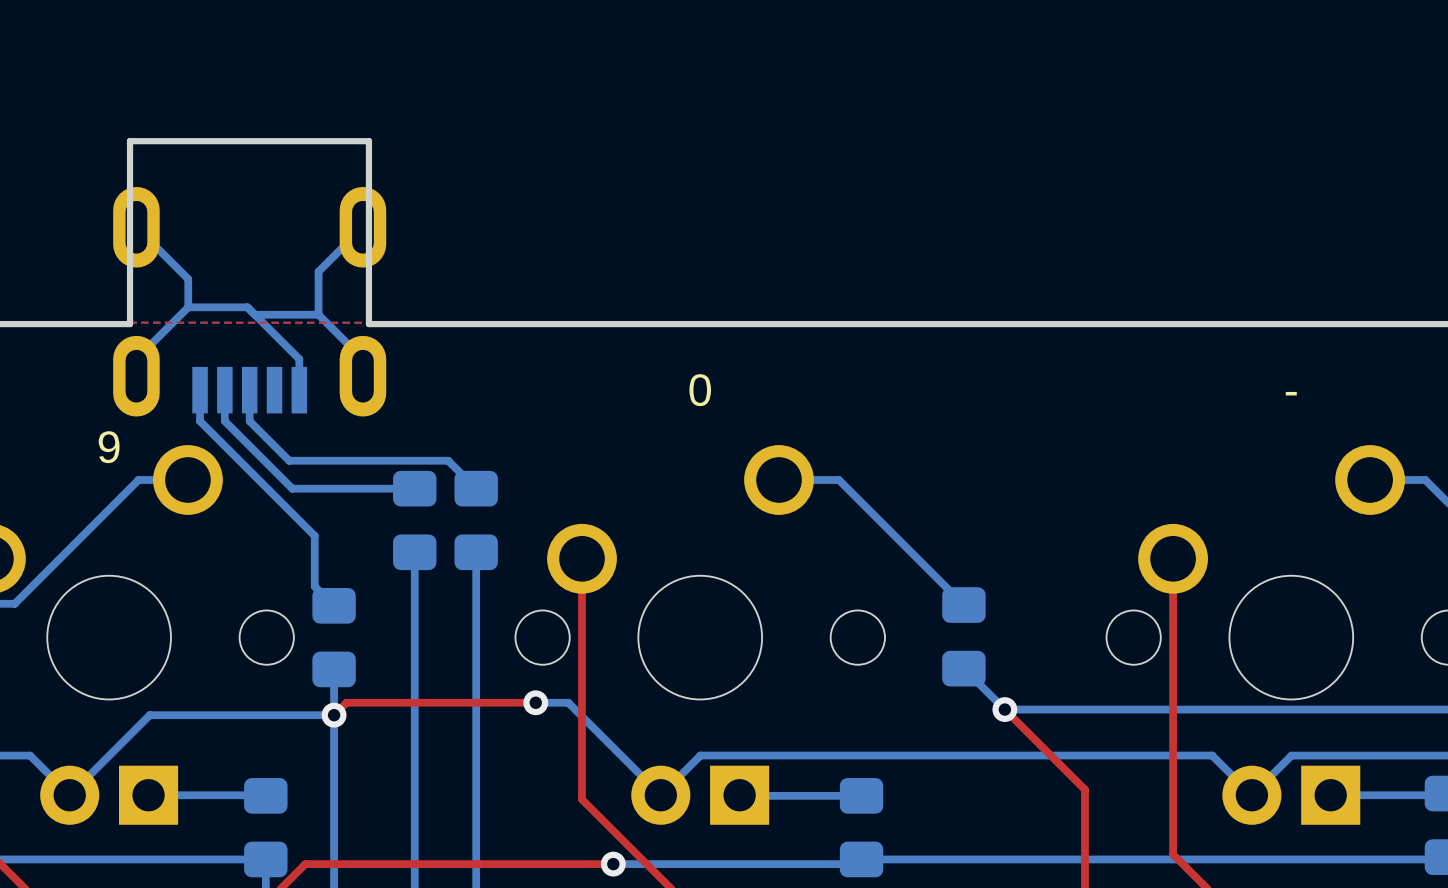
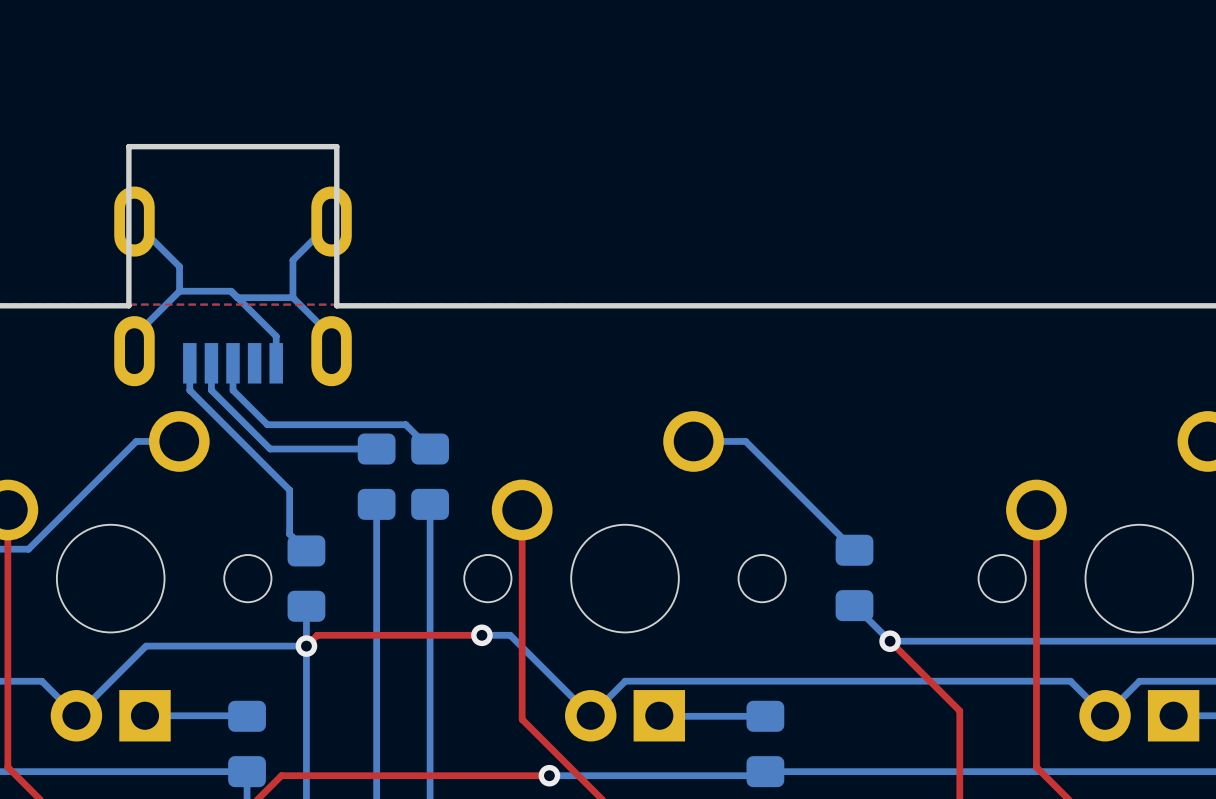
part value: 0 (700, 390) -> none
part value: - (1291, 393) -> none
part value: 9 (109, 447) -> none

